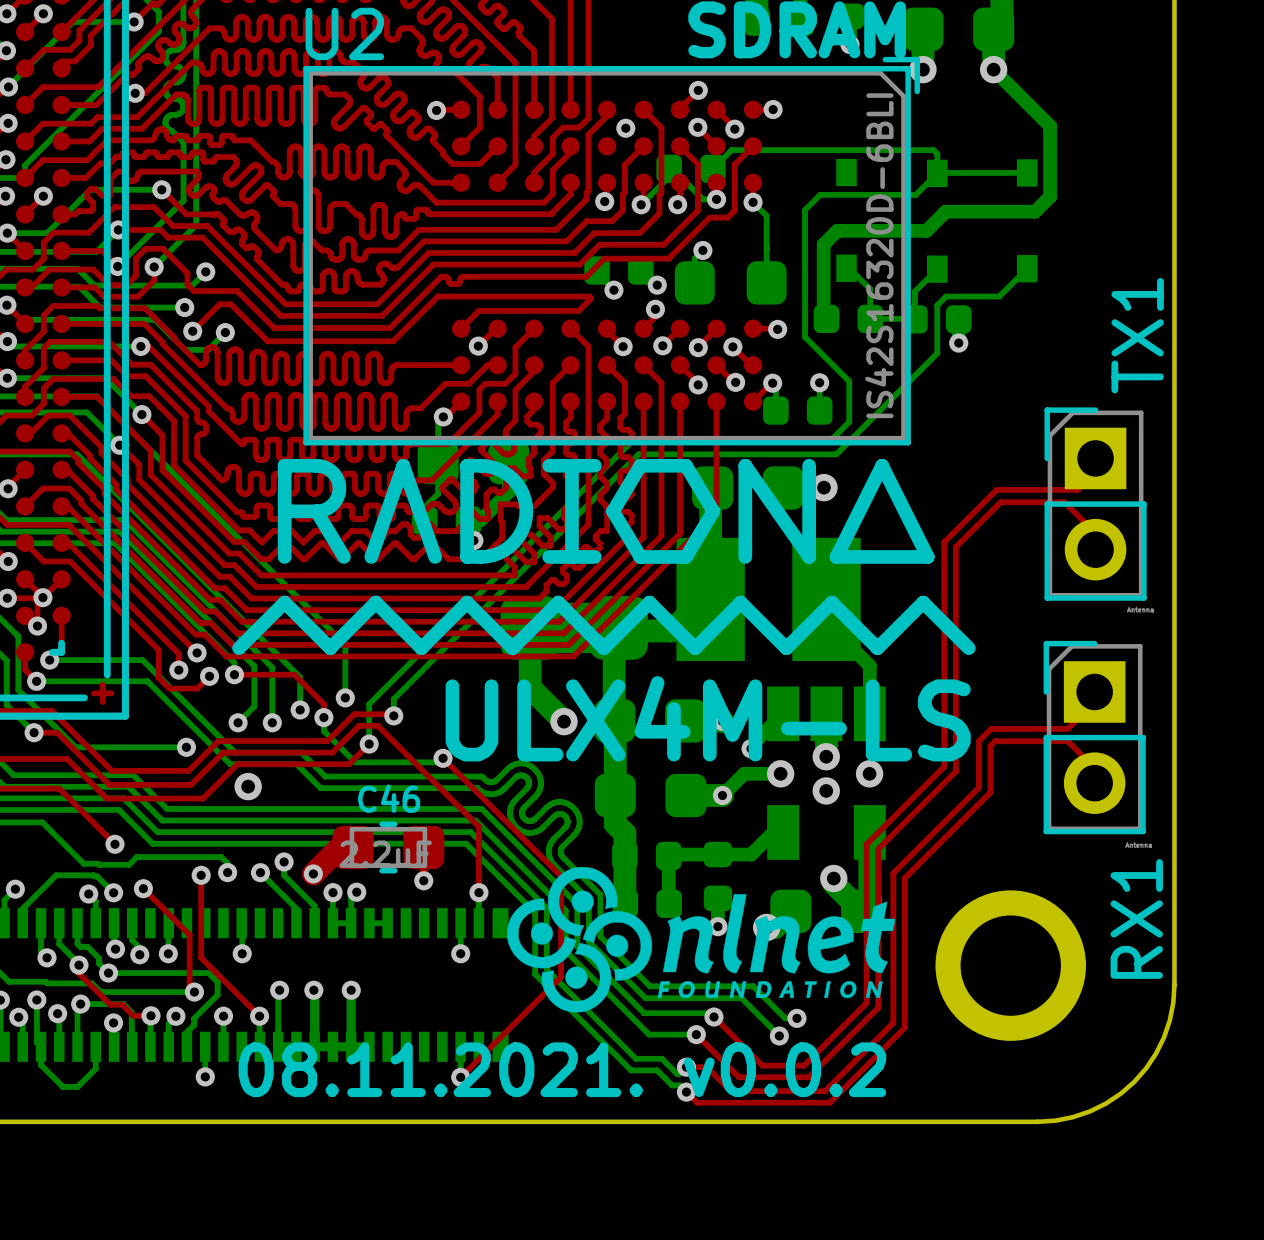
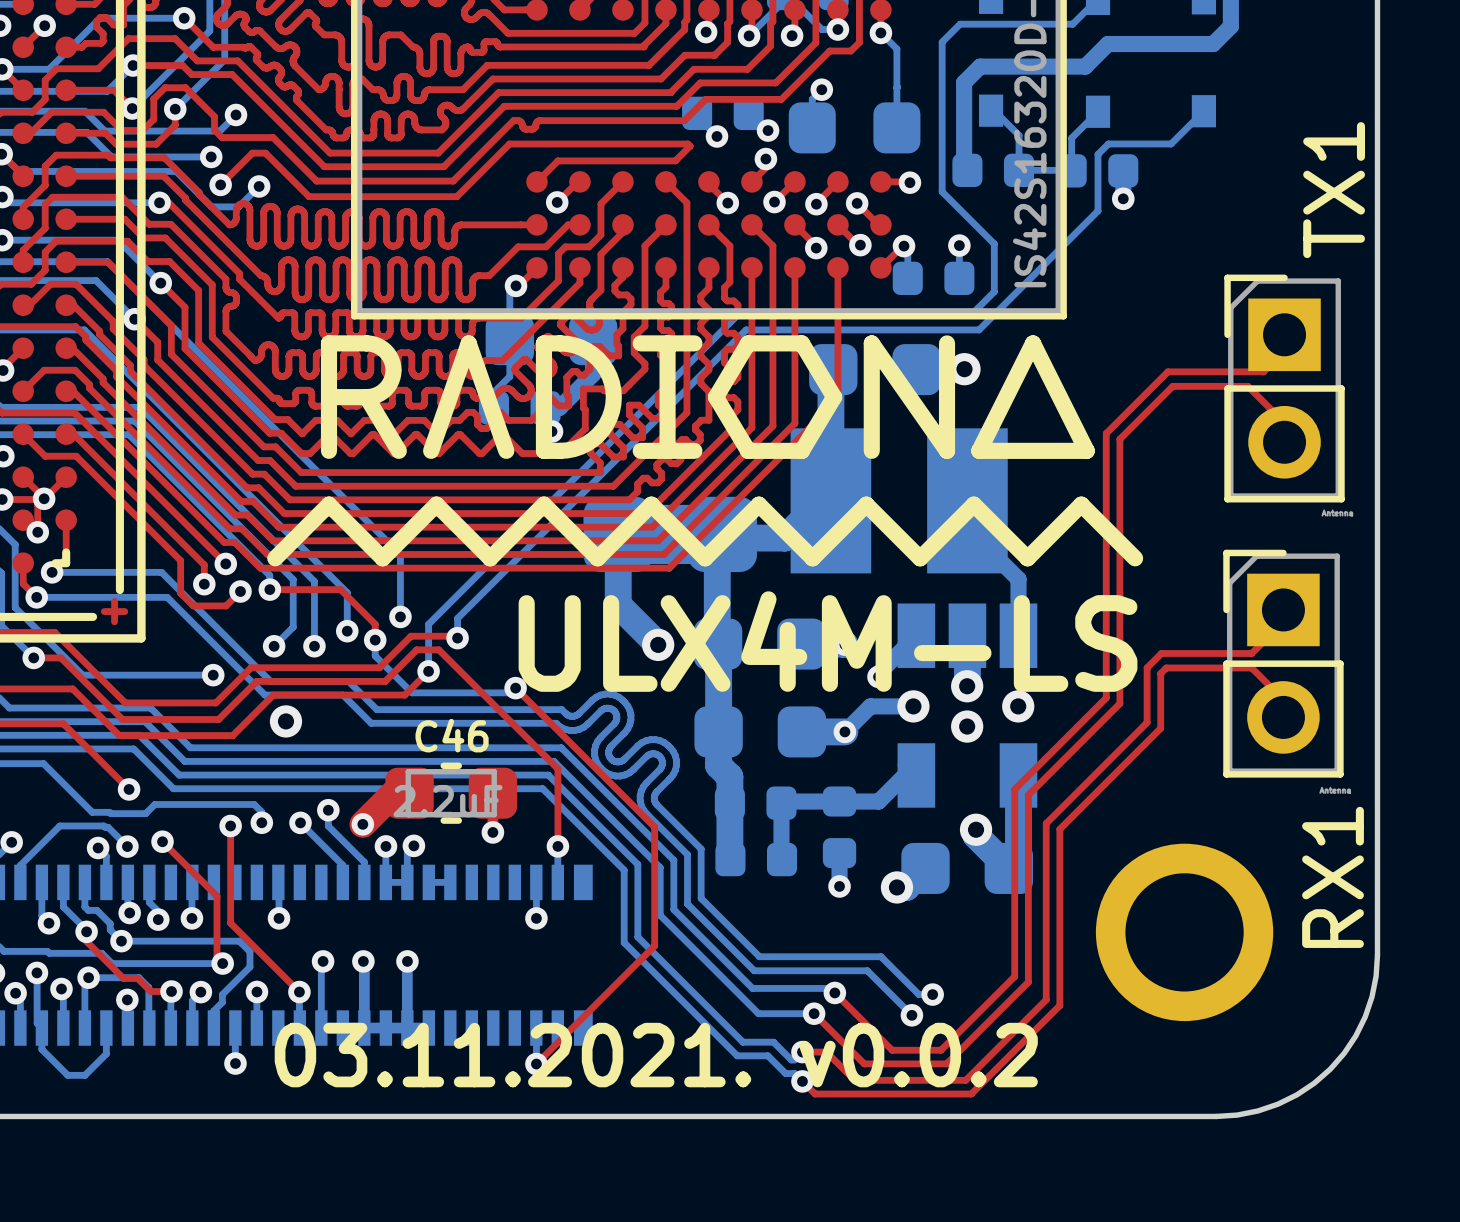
drawing: [507, 866, 896, 1013] -> none
text: 08.11.2021. v0.0.2 (562, 1069) -> 03.11.2021. v0.0.2 (656, 1055)

